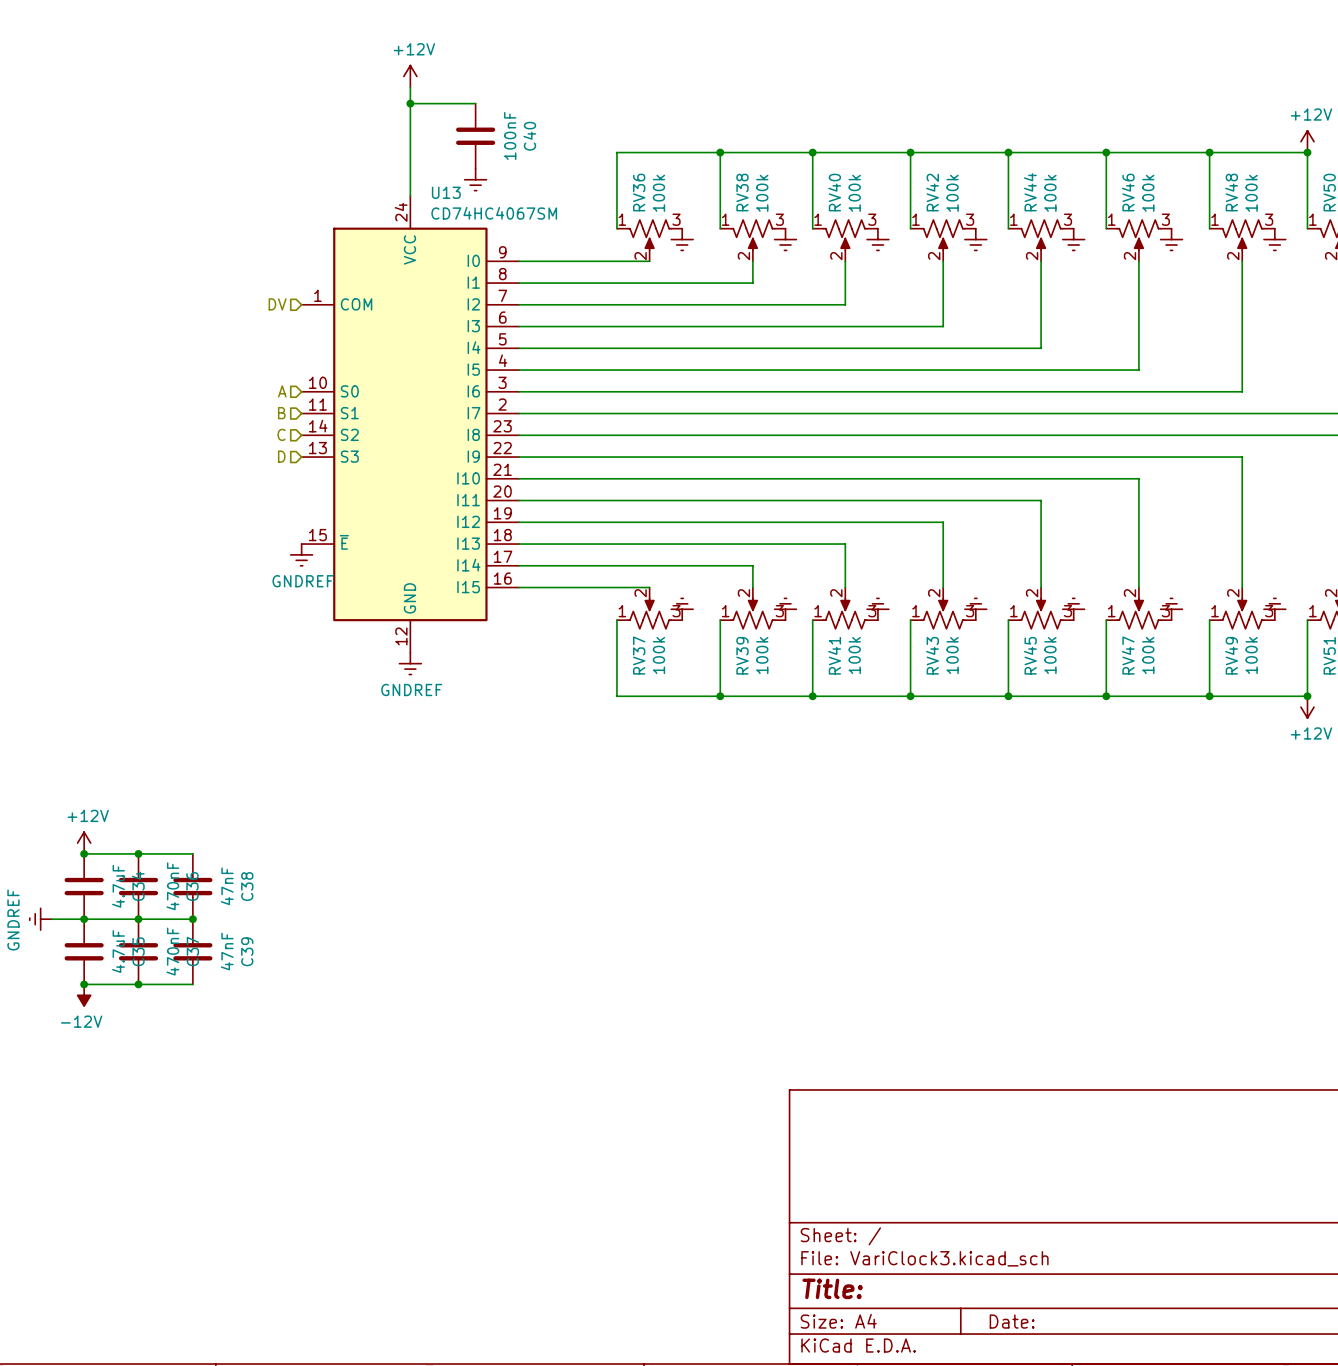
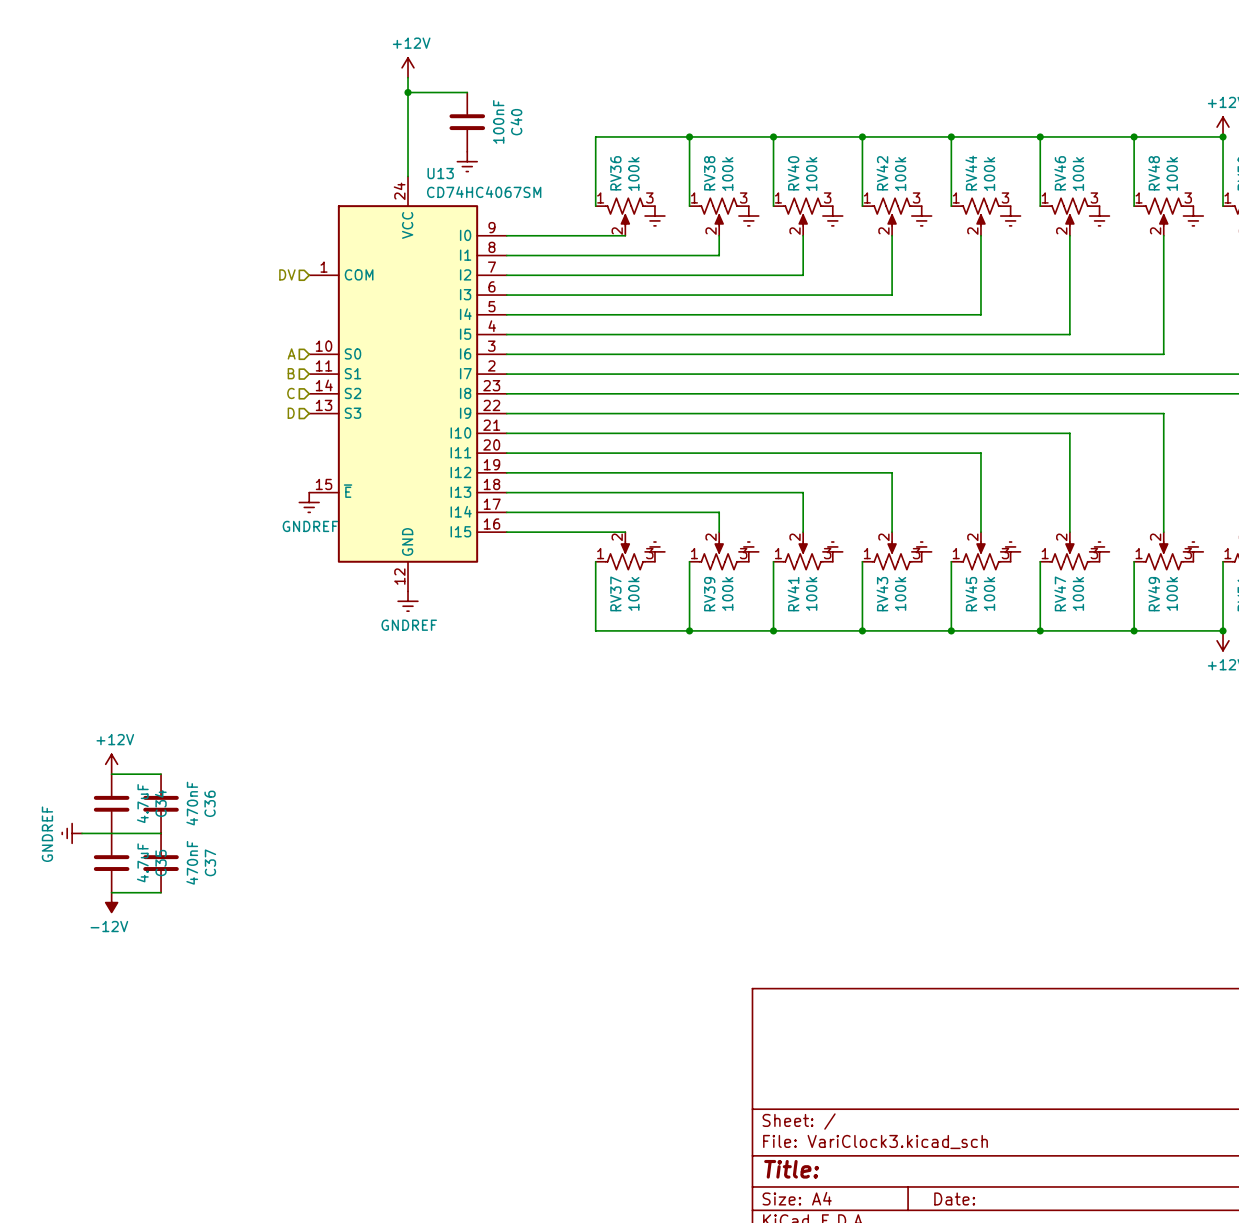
junction: (84, 853) -> none
wire: (138, 853) (192, 853) -> none
junction: (138, 853) -> none
C38: 47nF (192, 886) -> none
junction: (84, 919) -> none
wire: (138, 919) (192, 919) -> none
junction: (138, 919) -> none
junction: (192, 919) -> none
C39: 47nF (192, 951) -> none
junction: (84, 984) -> none
wire: (138, 984) (192, 984) -> none
junction: (138, 984) -> none

